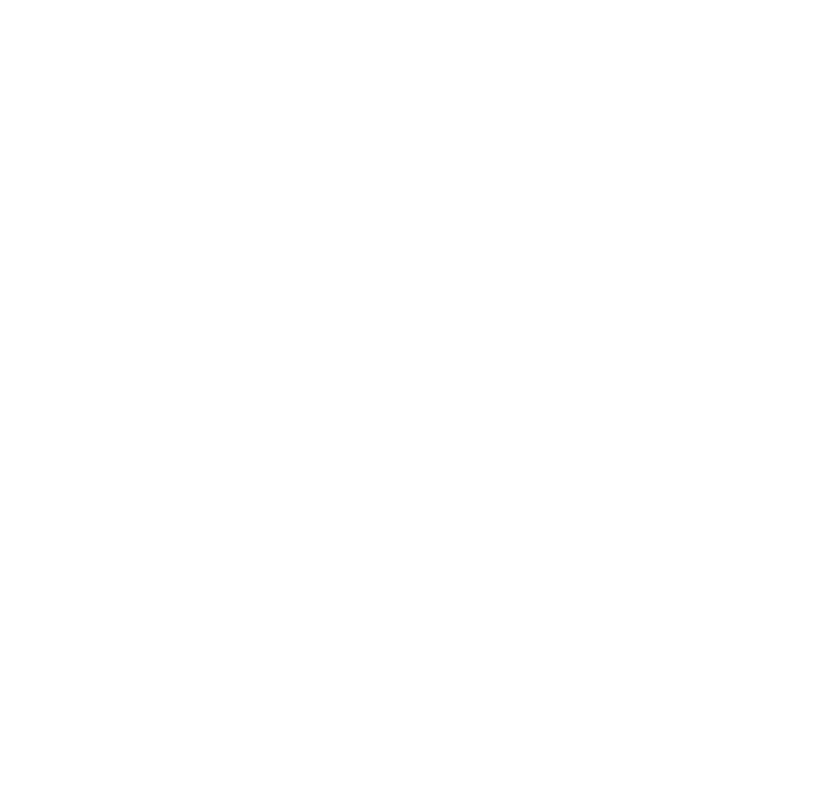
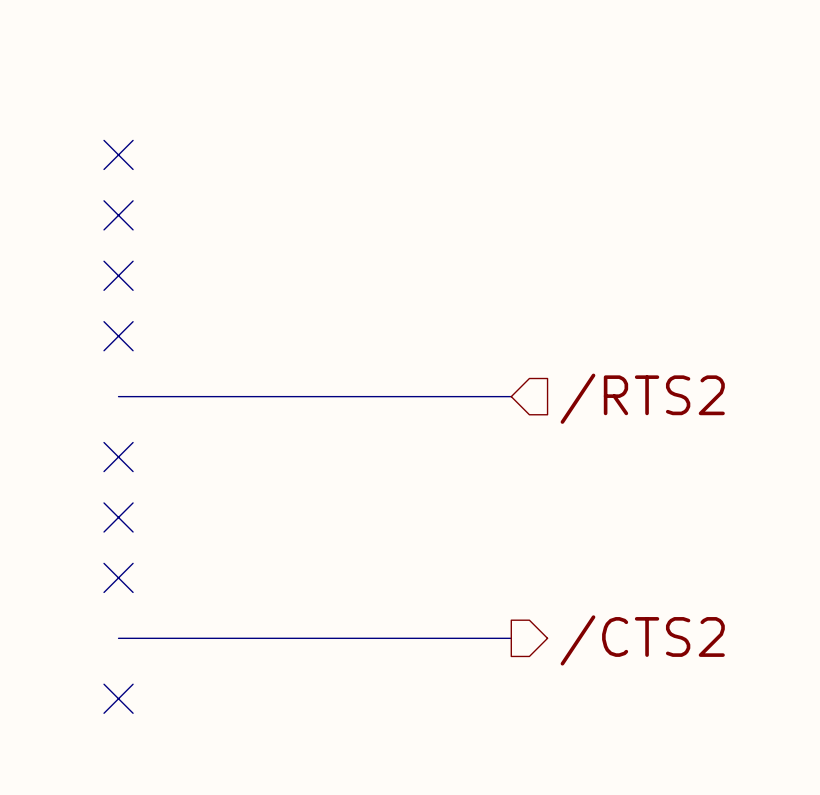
no-connect mark: none -> (118, 154)
no-connect mark: none -> (118, 215)
no-connect mark: none -> (118, 275)
no-connect mark: none -> (118, 336)
wire: none -> (118, 396) (511, 396)
hierarchical label: none -> /RTS2 (642, 398)
no-connect mark: none -> (118, 457)
no-connect mark: none -> (118, 517)
no-connect mark: none -> (118, 577)
wire: none -> (118, 638) (511, 638)
hierarchical label: none -> /CTS2 (642, 640)
no-connect mark: none -> (118, 698)

